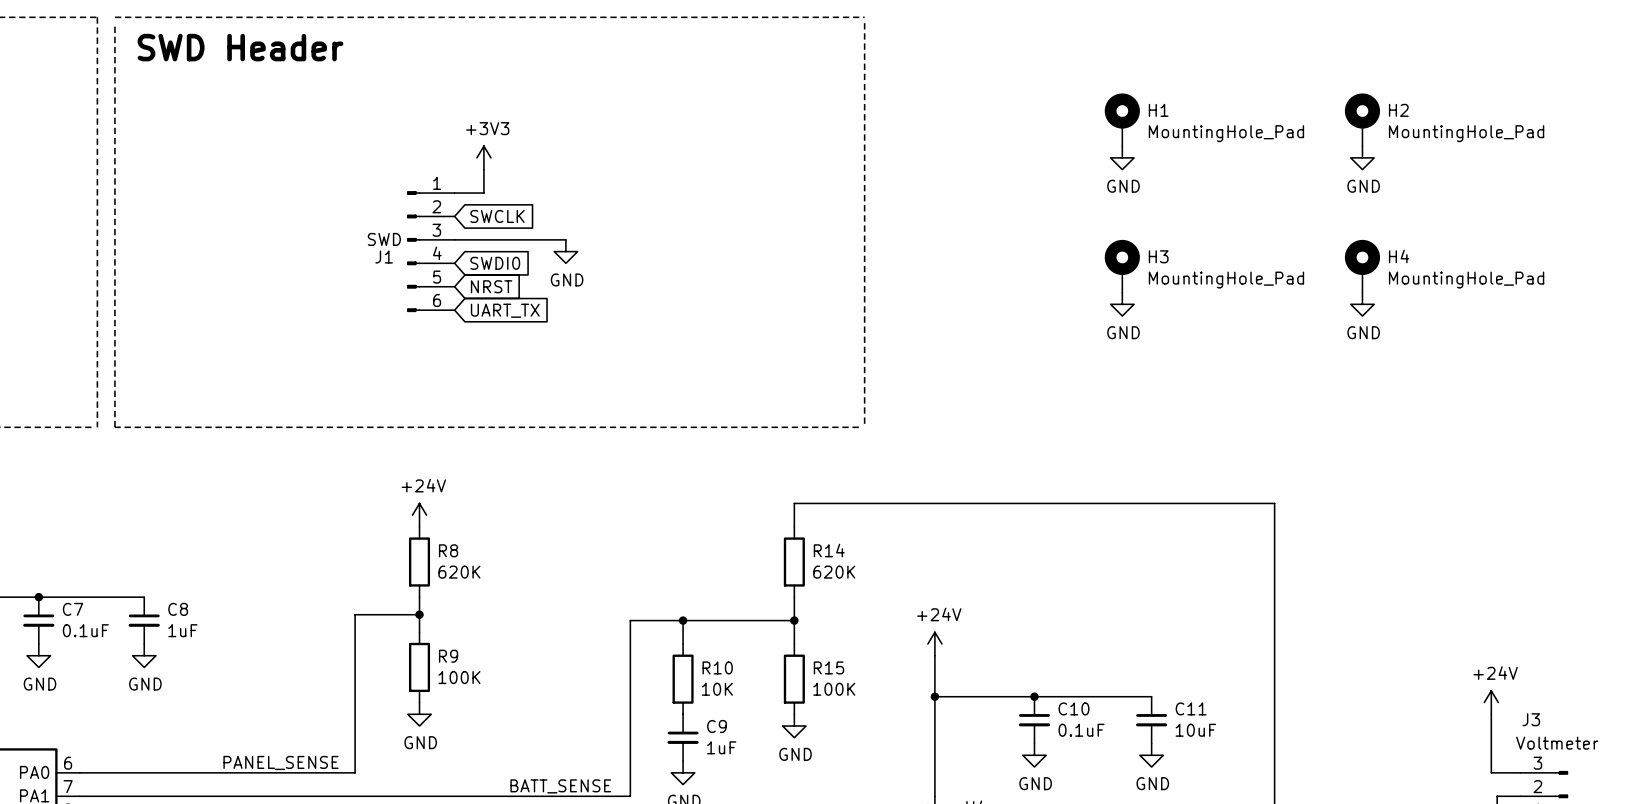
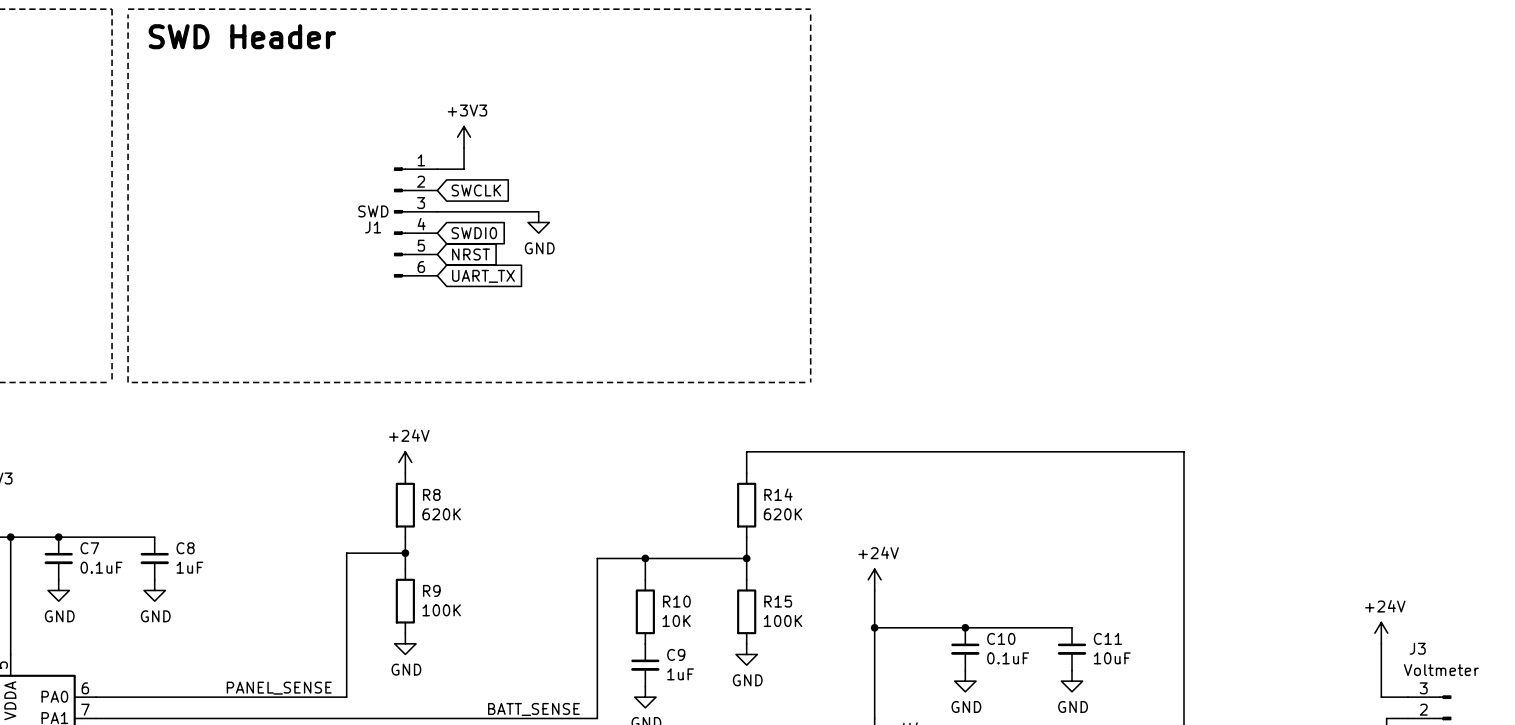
H1: MountingHole_Pad (1122, 119) -> none
H2: MountingHole_Pad (1362, 119) -> none
power symbol: GND (1122, 157) -> none
power symbol: GND (1362, 157) -> none
H3: MountingHole_Pad (1122, 266) -> none
H4: MountingHole_Pad (1362, 266) -> none
power symbol: GND (1122, 304) -> none
power symbol: GND (1362, 304) -> none

